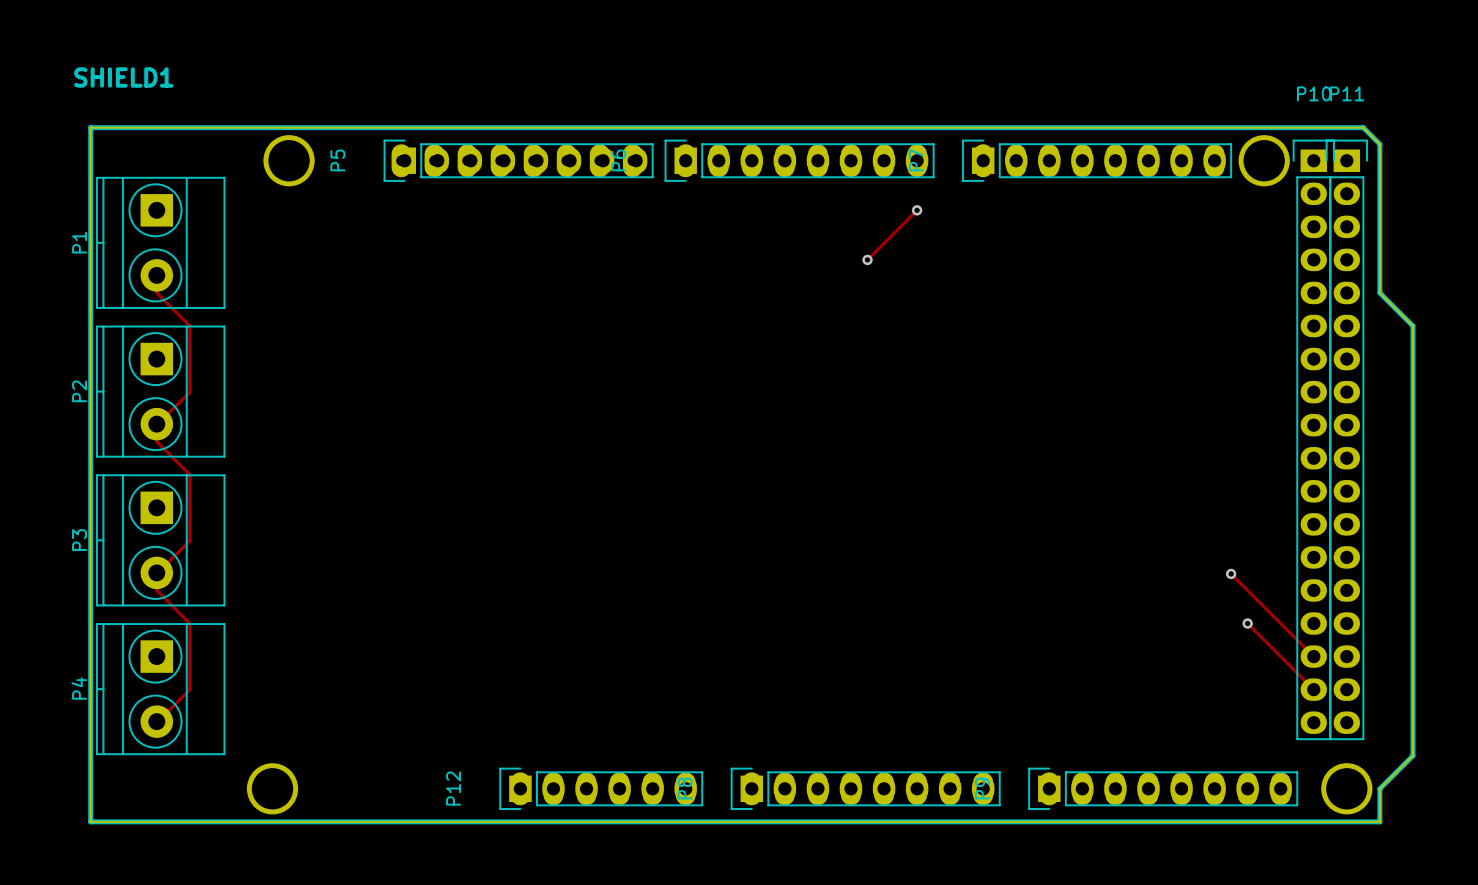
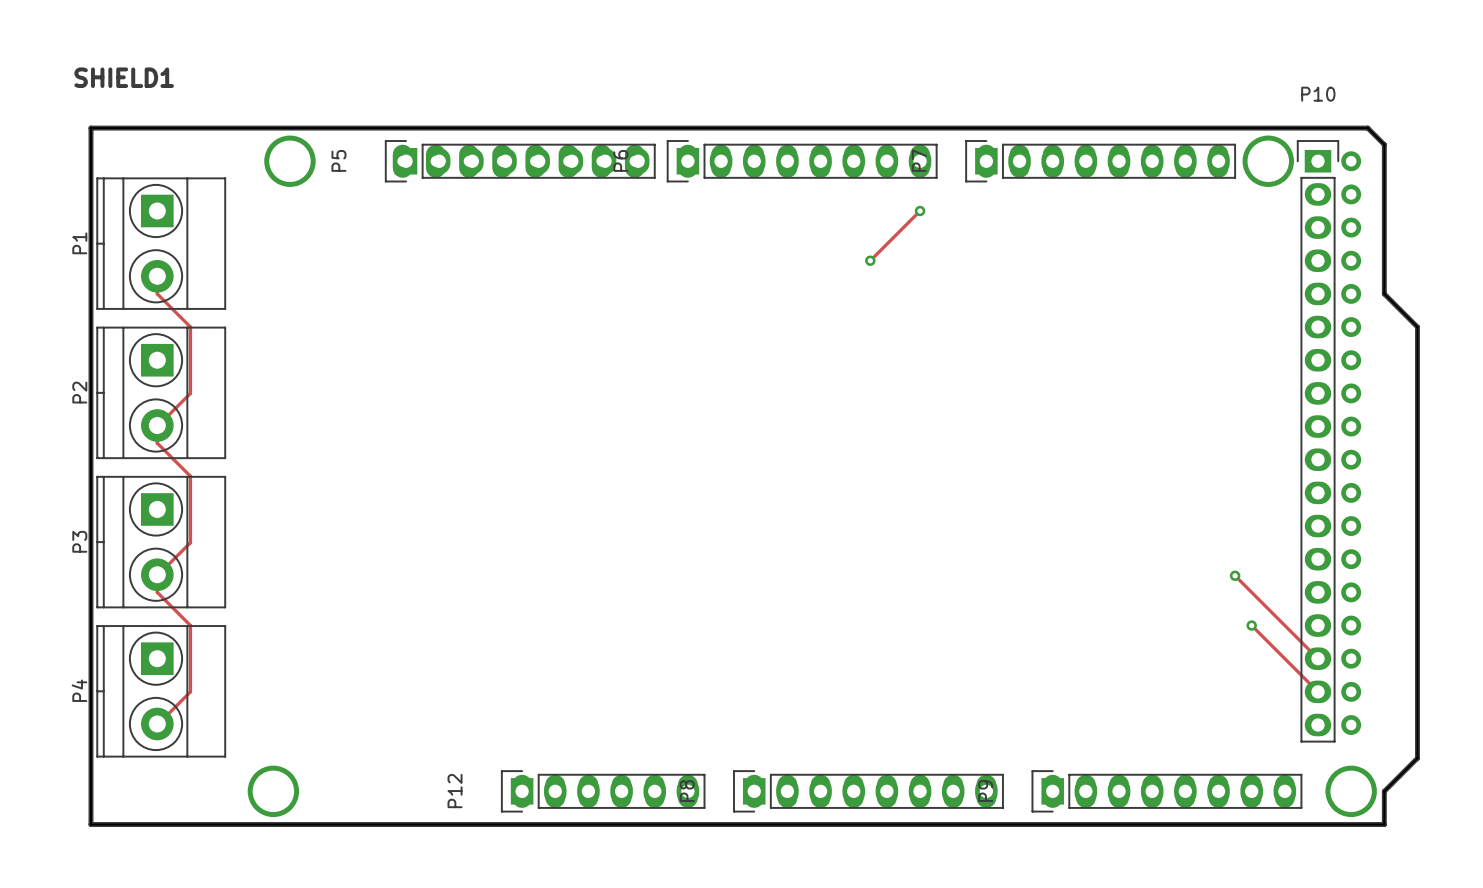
P11: (1346, 439) -> none

